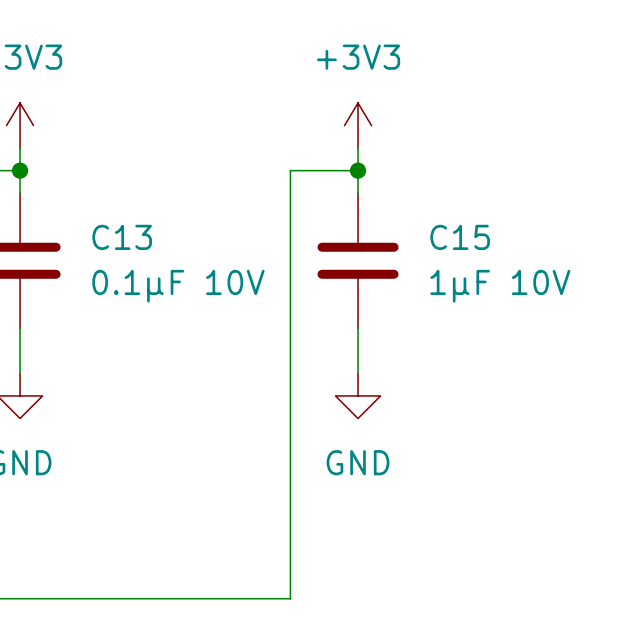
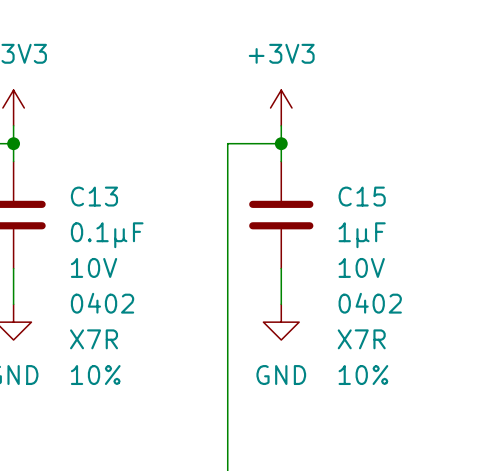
C13 value: 0.1µF 10V (178, 286) -> 0.1µF (107, 235)
C15 value: 1µF 10V (500, 286) -> 1µF (362, 235)
C13 text: none -> 10V (94, 267)
C15 text: none -> 10V (361, 267)
C13 text: none -> 0402 (102, 303)
C15 text: none -> 0402 (370, 303)
C13 text: none -> X7R (94, 339)
C15 text: none -> X7R (361, 339)
C13 text: none -> 10% (95, 375)
C15 text: none -> 10% (363, 375)

